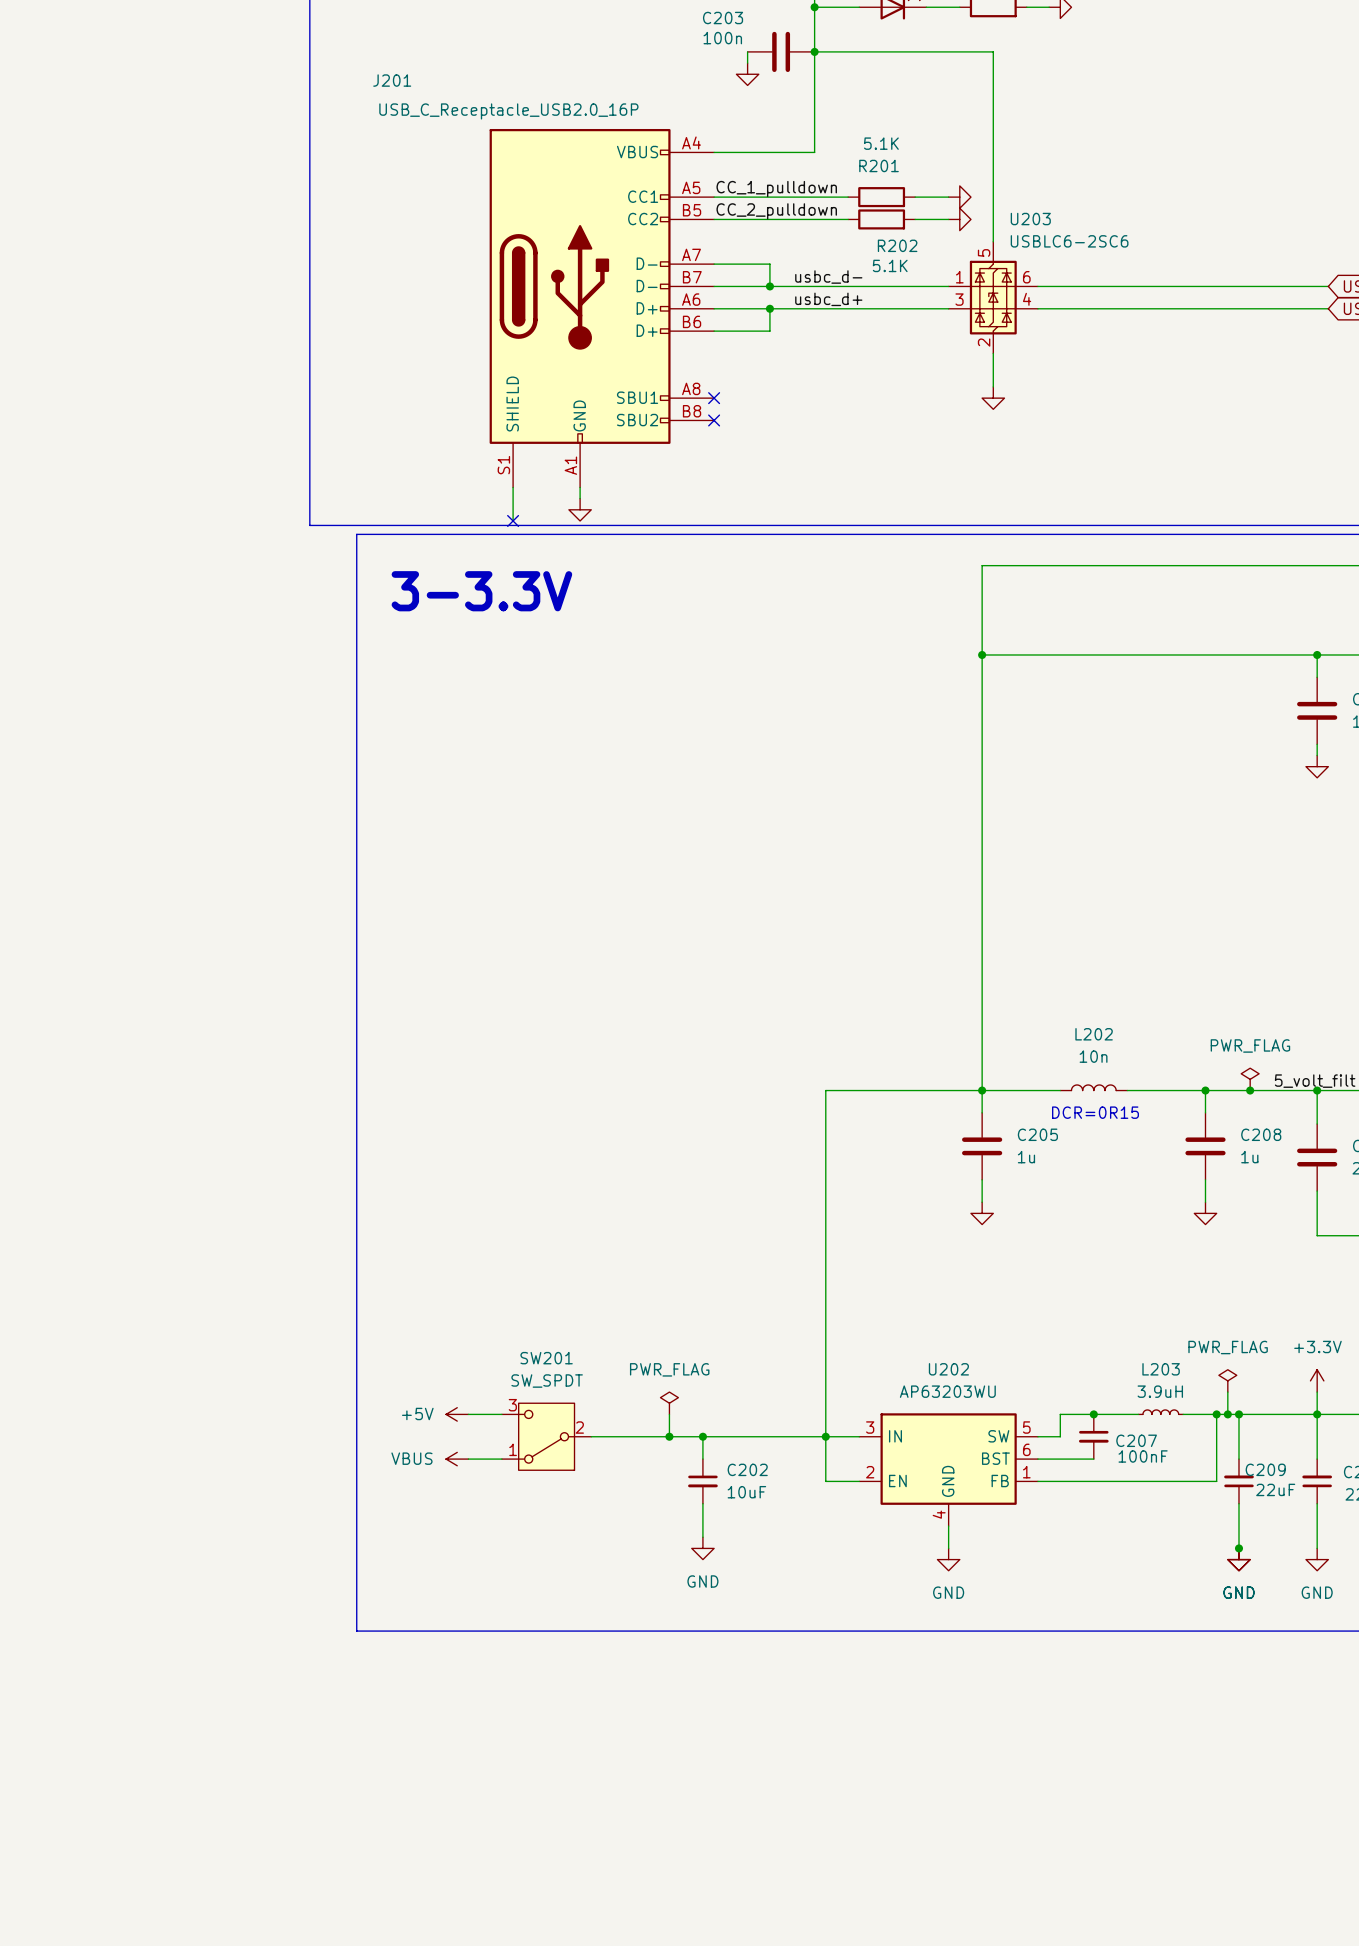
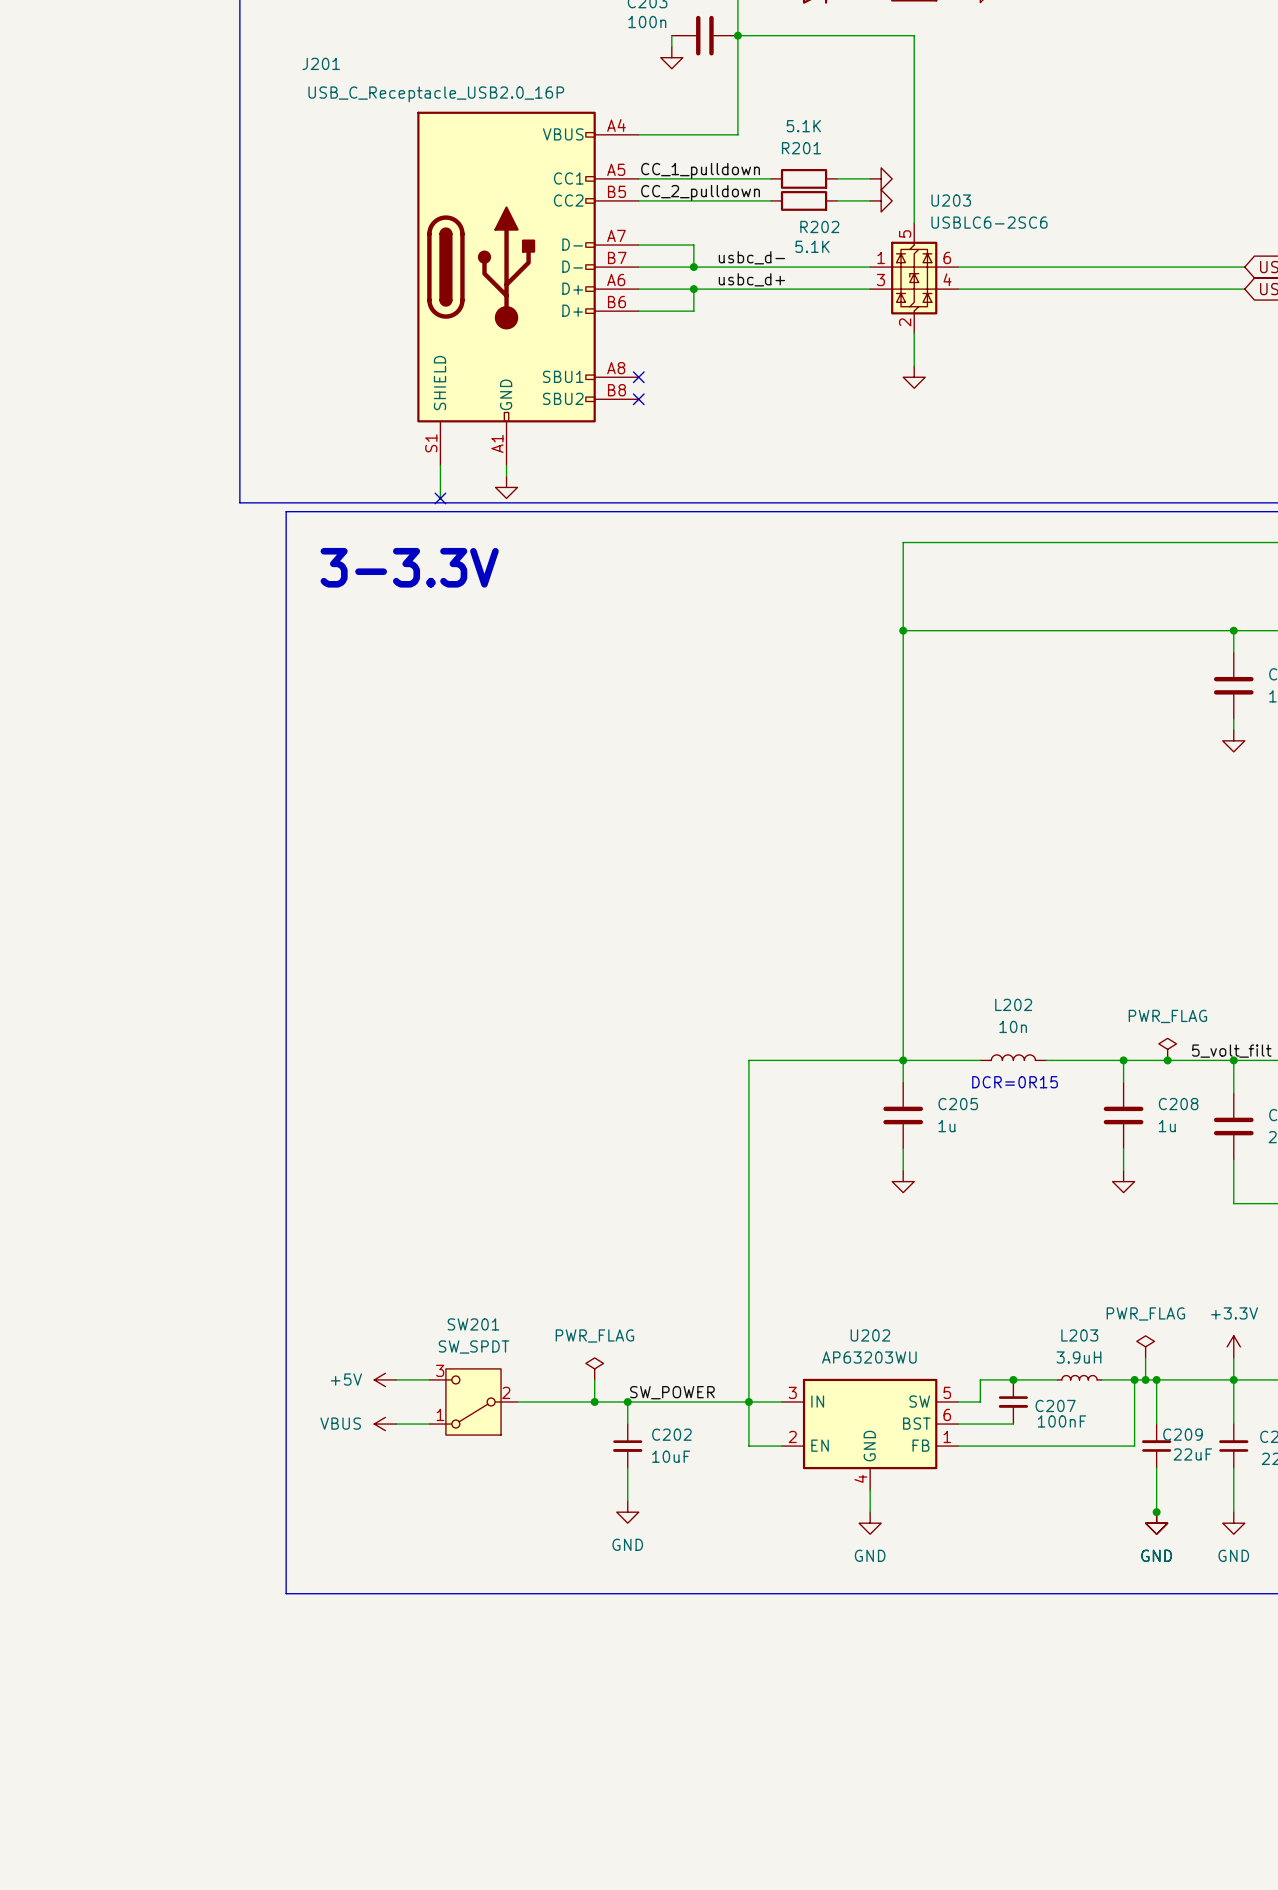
label: none -> SW_POWER (672, 1392)

